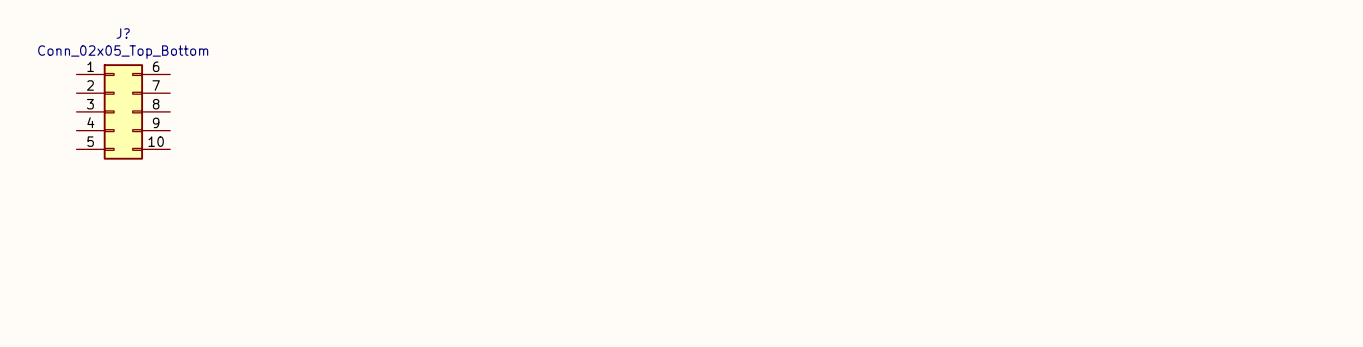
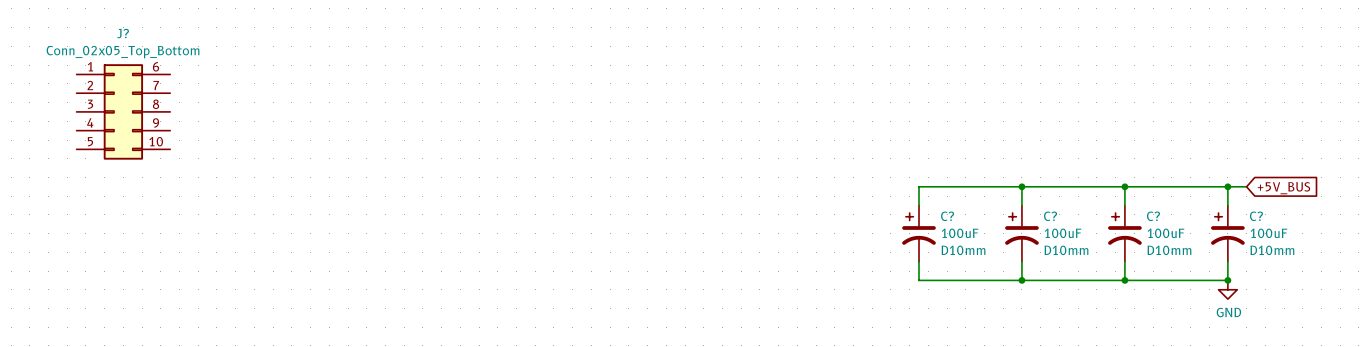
wire: none -> (1021, 186) (1021, 205)
junction: none -> (1021, 186)
wire: none -> (1124, 186) (1124, 205)
junction: none -> (1124, 186)
wire: none -> (1227, 186) (1227, 205)
junction: none -> (1227, 186)
wire: none -> (1246, 186) (919, 186) (919, 205)
global label: none -> +5V_BUS (1283, 188)
C?: none -> 100uF (919, 233)
C?: none -> 100uF (1021, 233)
C?: none -> 100uF (1124, 233)
C?: none -> 100uF (1227, 233)
wire: none -> (919, 261) (919, 280) (1227, 280) (1227, 261)
wire: none -> (1021, 261) (1021, 280)
wire: none -> (1124, 261) (1124, 280)
junction: none -> (1021, 280)
junction: none -> (1124, 280)
junction: none -> (1227, 280)
power symbol: none -> GND (1227, 289)

